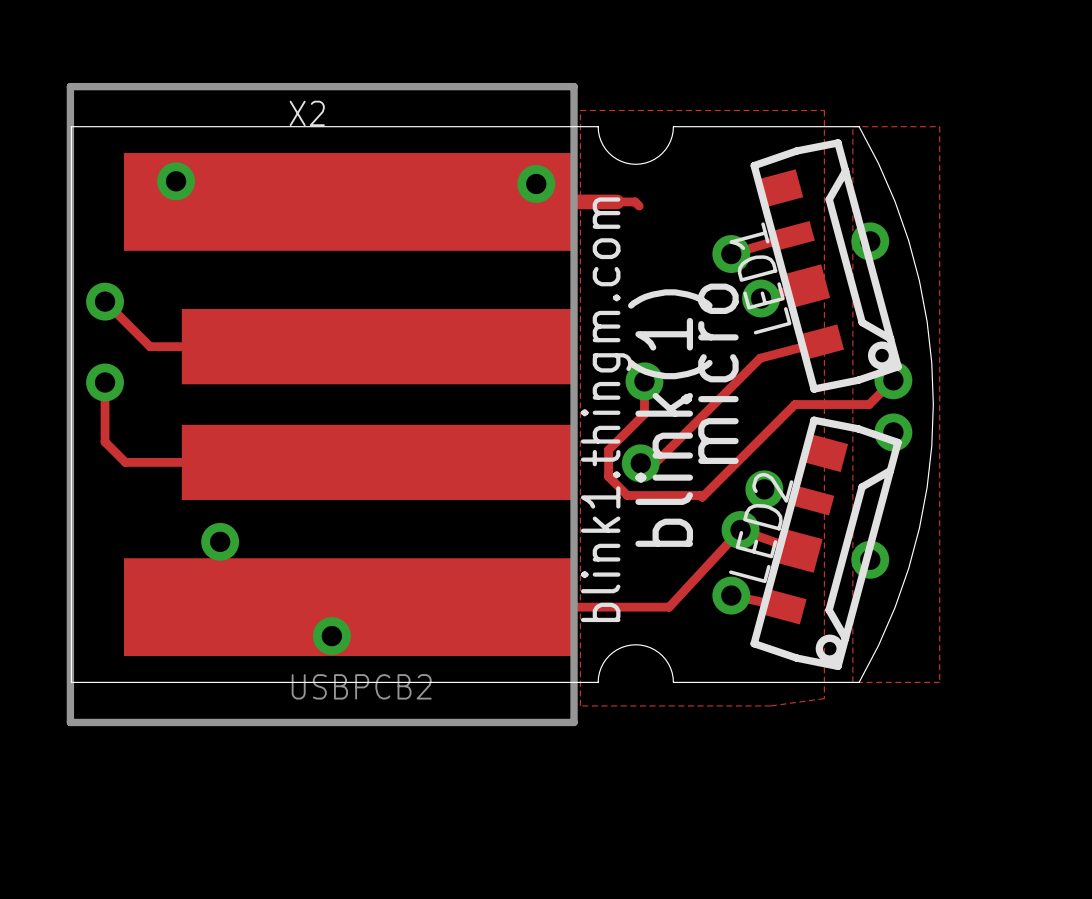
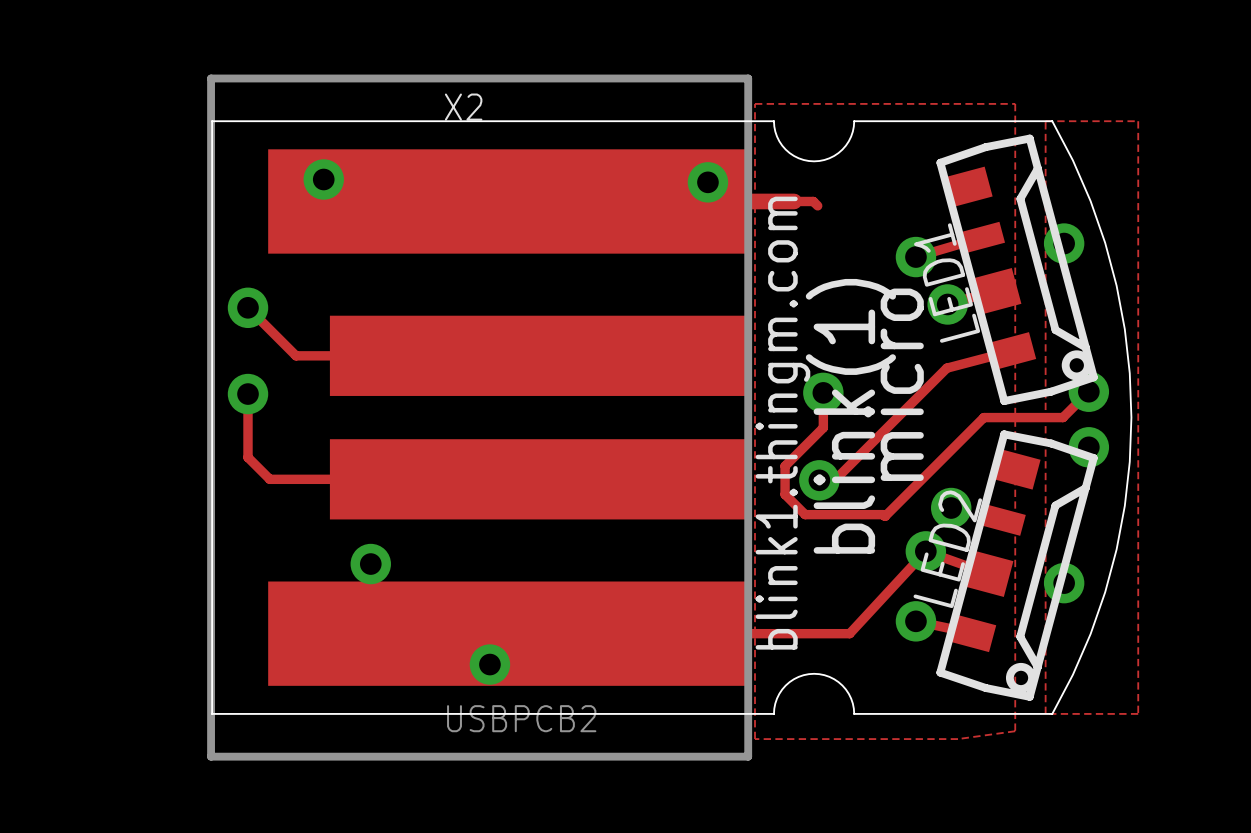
text position: blink(1) (670, 418) -> blink(1) (850, 416)

